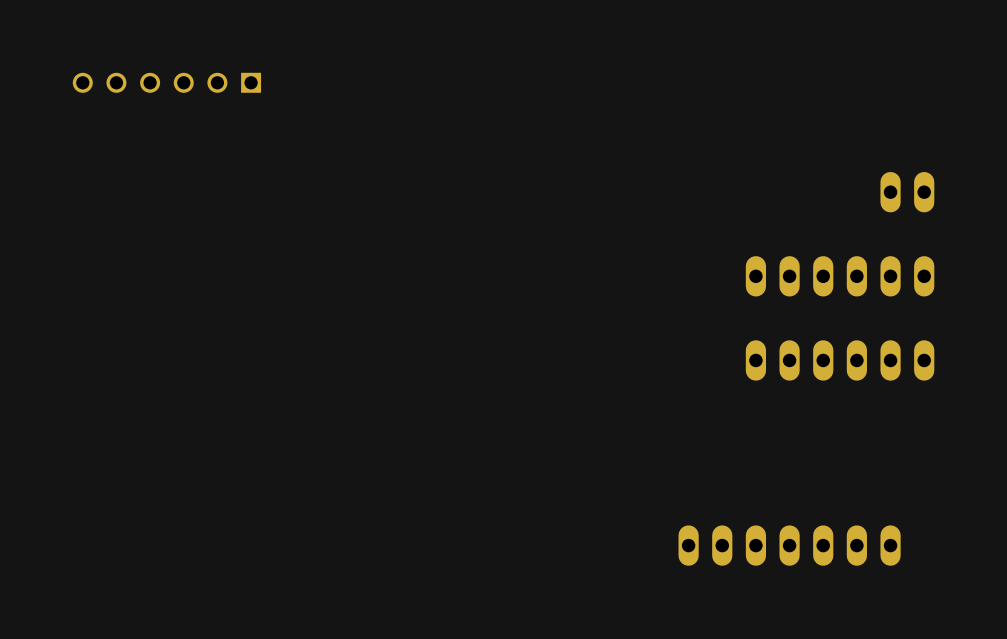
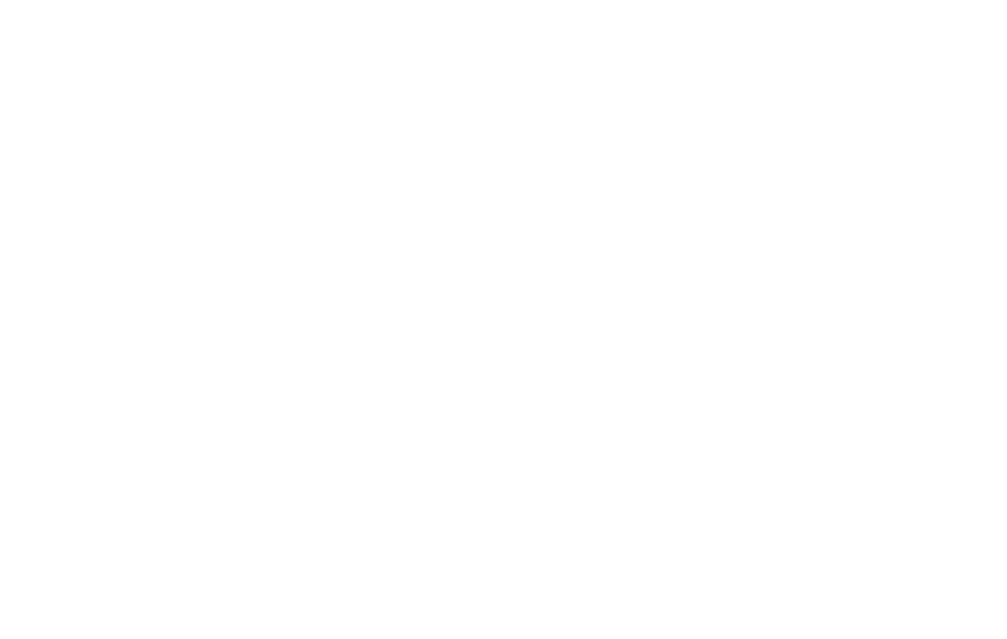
part: (166, 82) -> none
part: (907, 192) -> none
part: (840, 276) -> none
part: (840, 360) -> none
part: (789, 545) -> none

